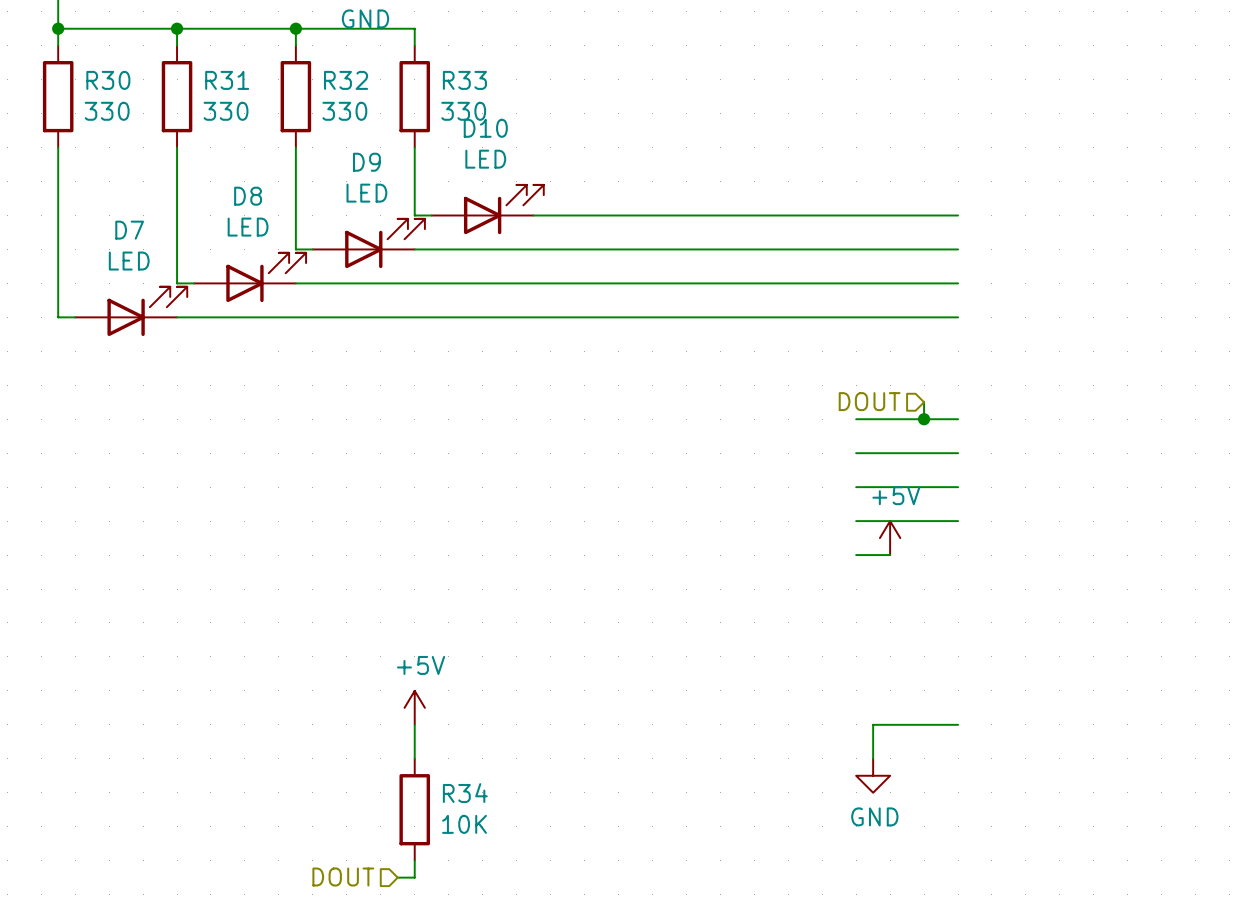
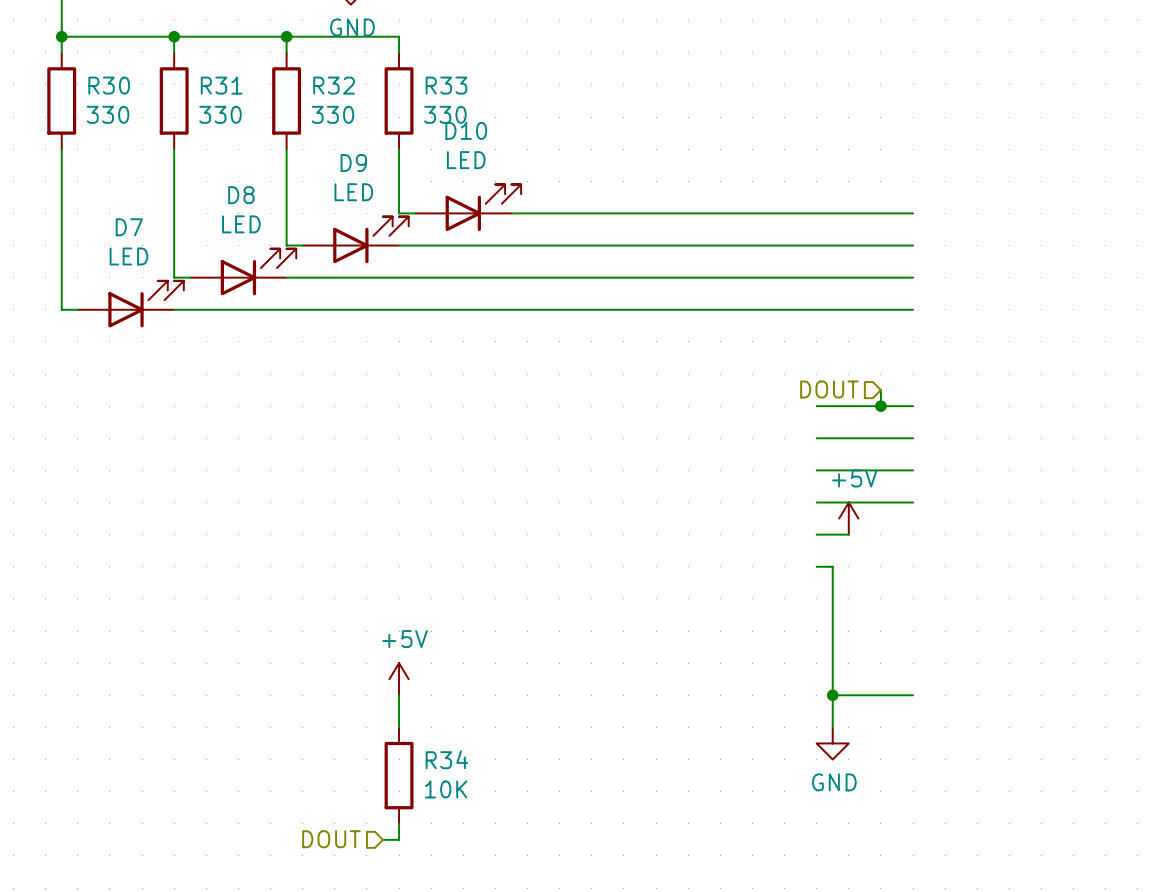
wire: none -> (816, 566) (832, 566) (832, 695)
junction: none -> (832, 695)

